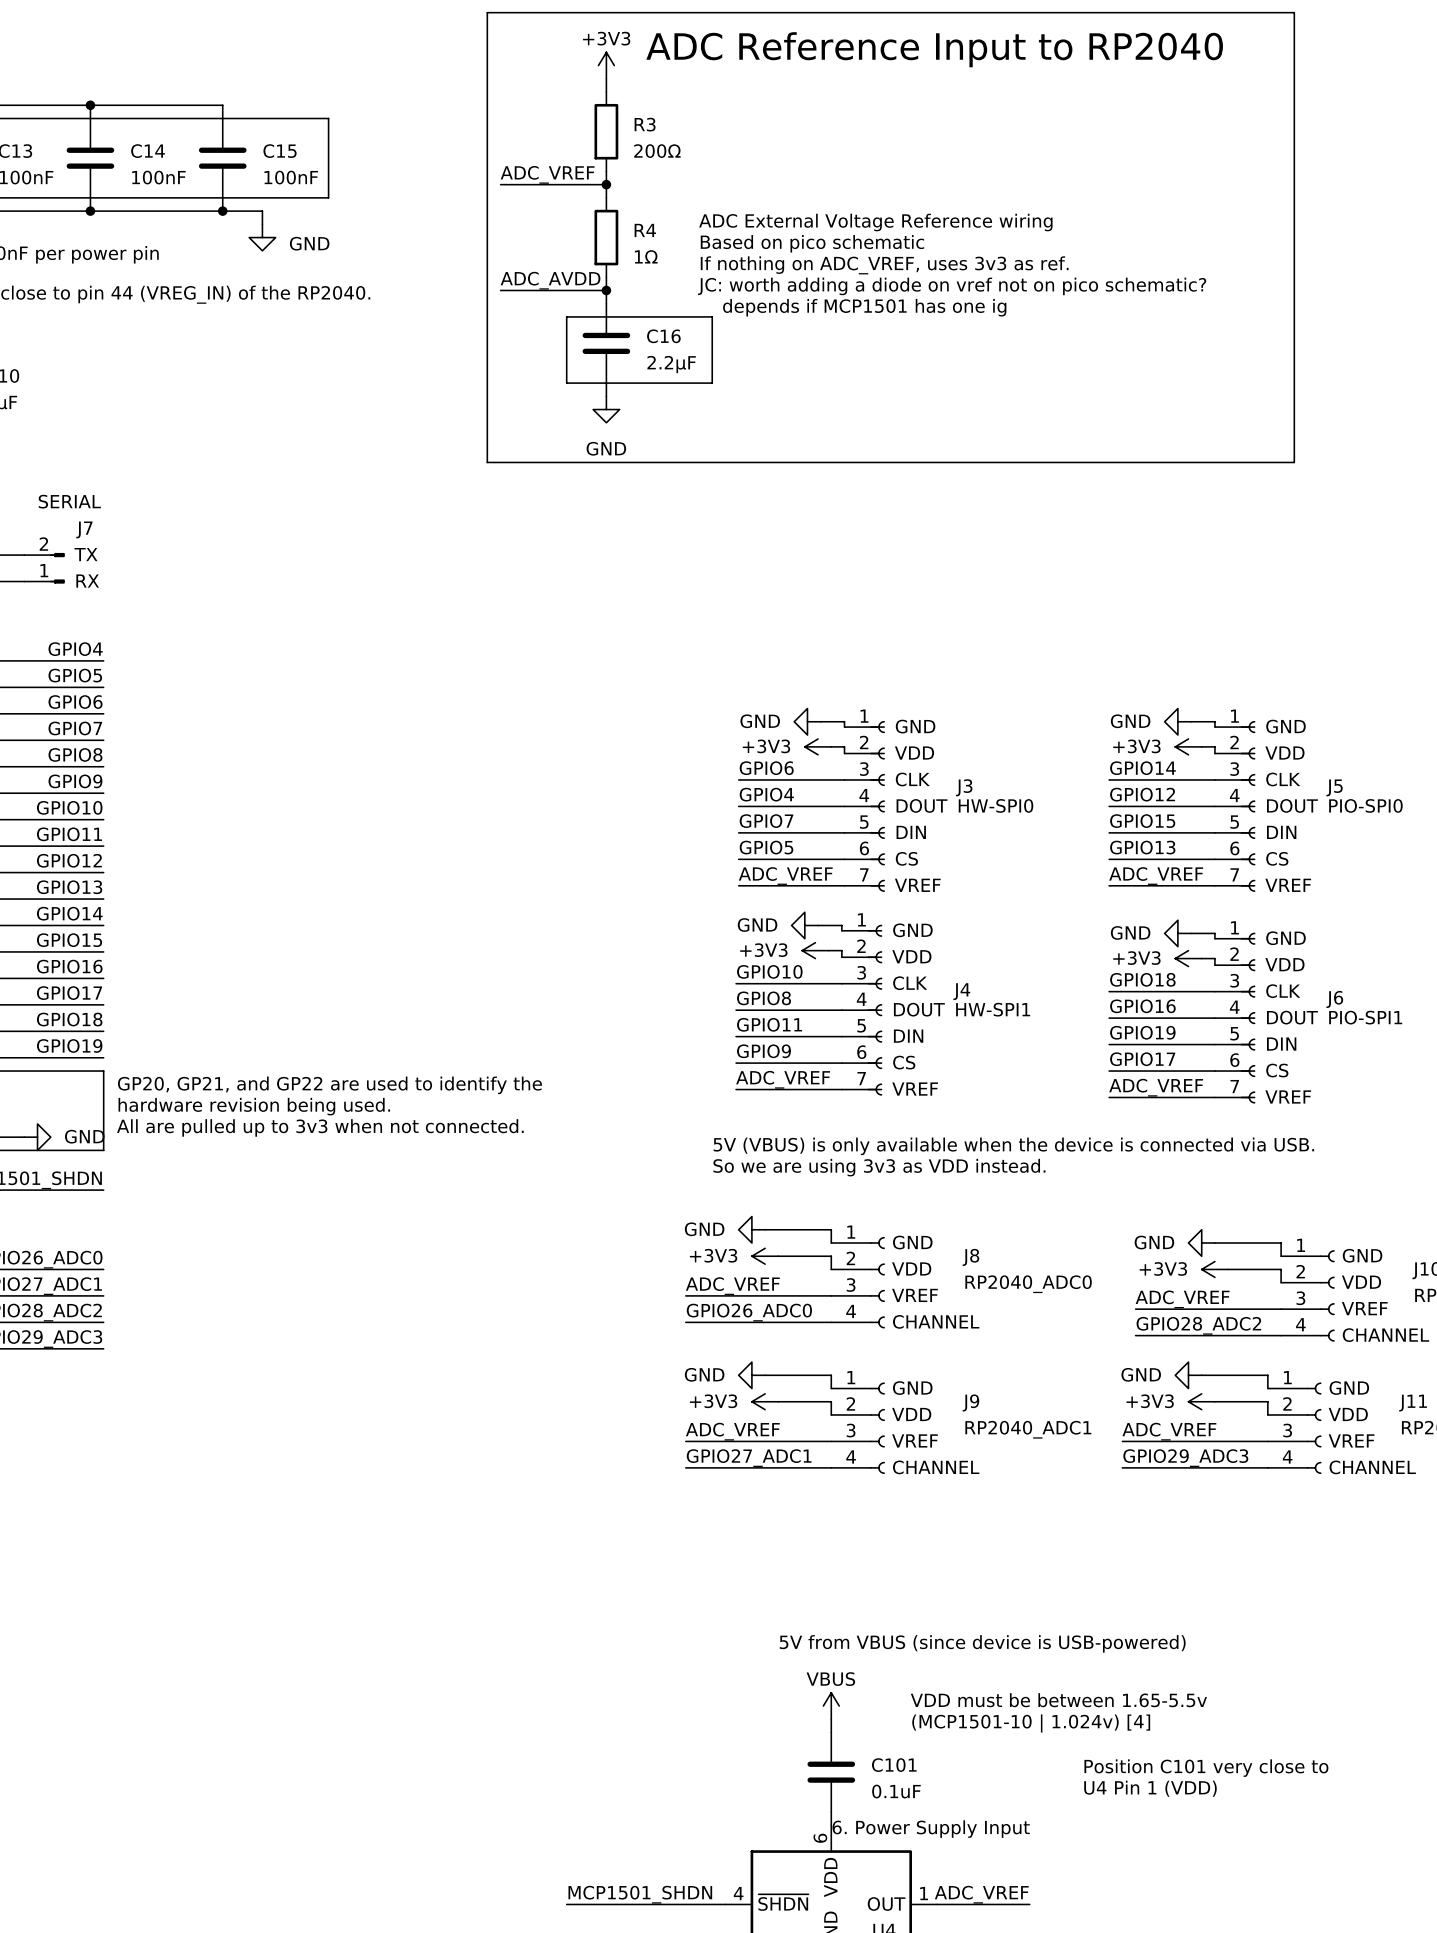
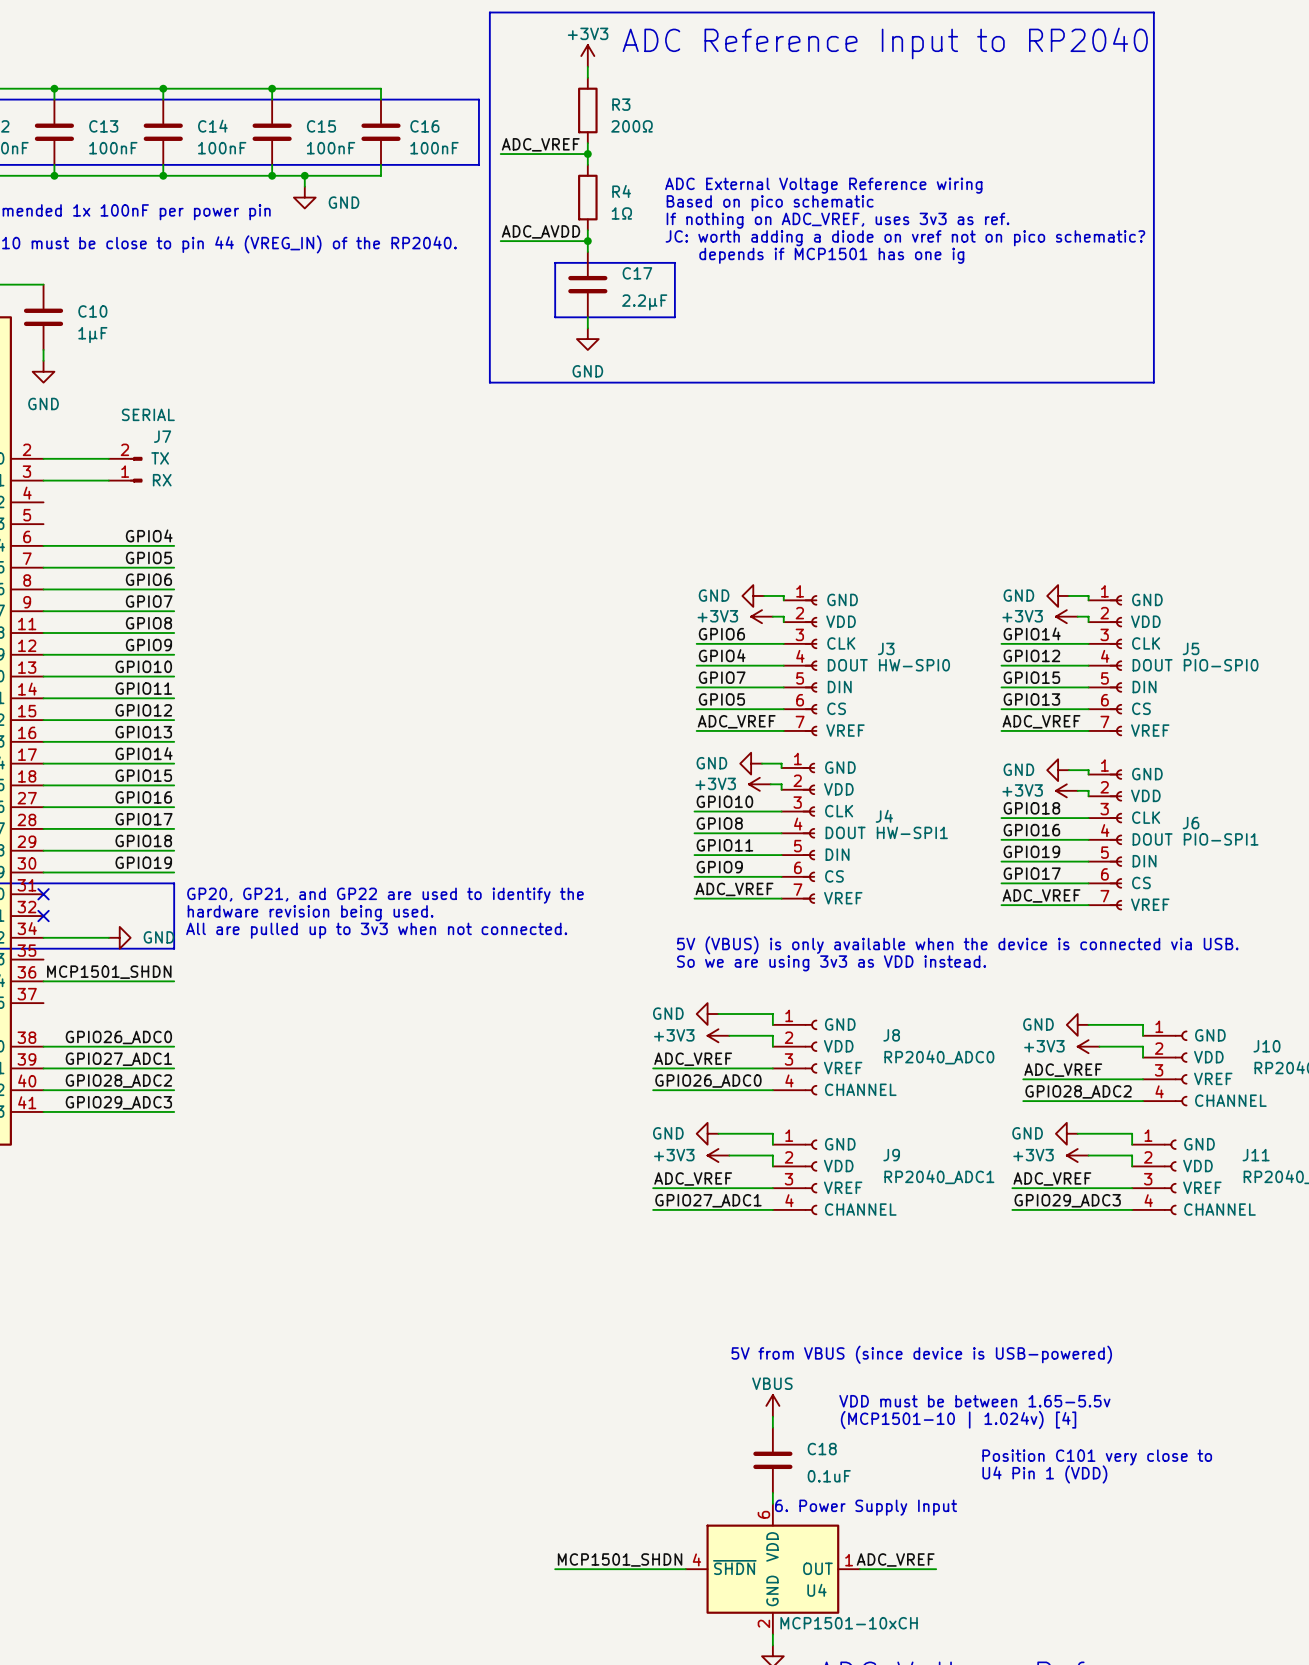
wire: none -> (272, 88) (381, 88) (381, 99)
junction: none -> (272, 88)
line: (328, 118) (328, 197) -> (359, 99) (478, 99) (478, 164) (359, 164)
C16: none -> 100nF (381, 132)
wire: none -> (381, 164) (381, 175) (304, 175)
junction: none -> (304, 175)
C16 name: C16 (663, 336) -> C17 (637, 273)
C101 name: C101 (894, 1765) -> C18 (822, 1449)

